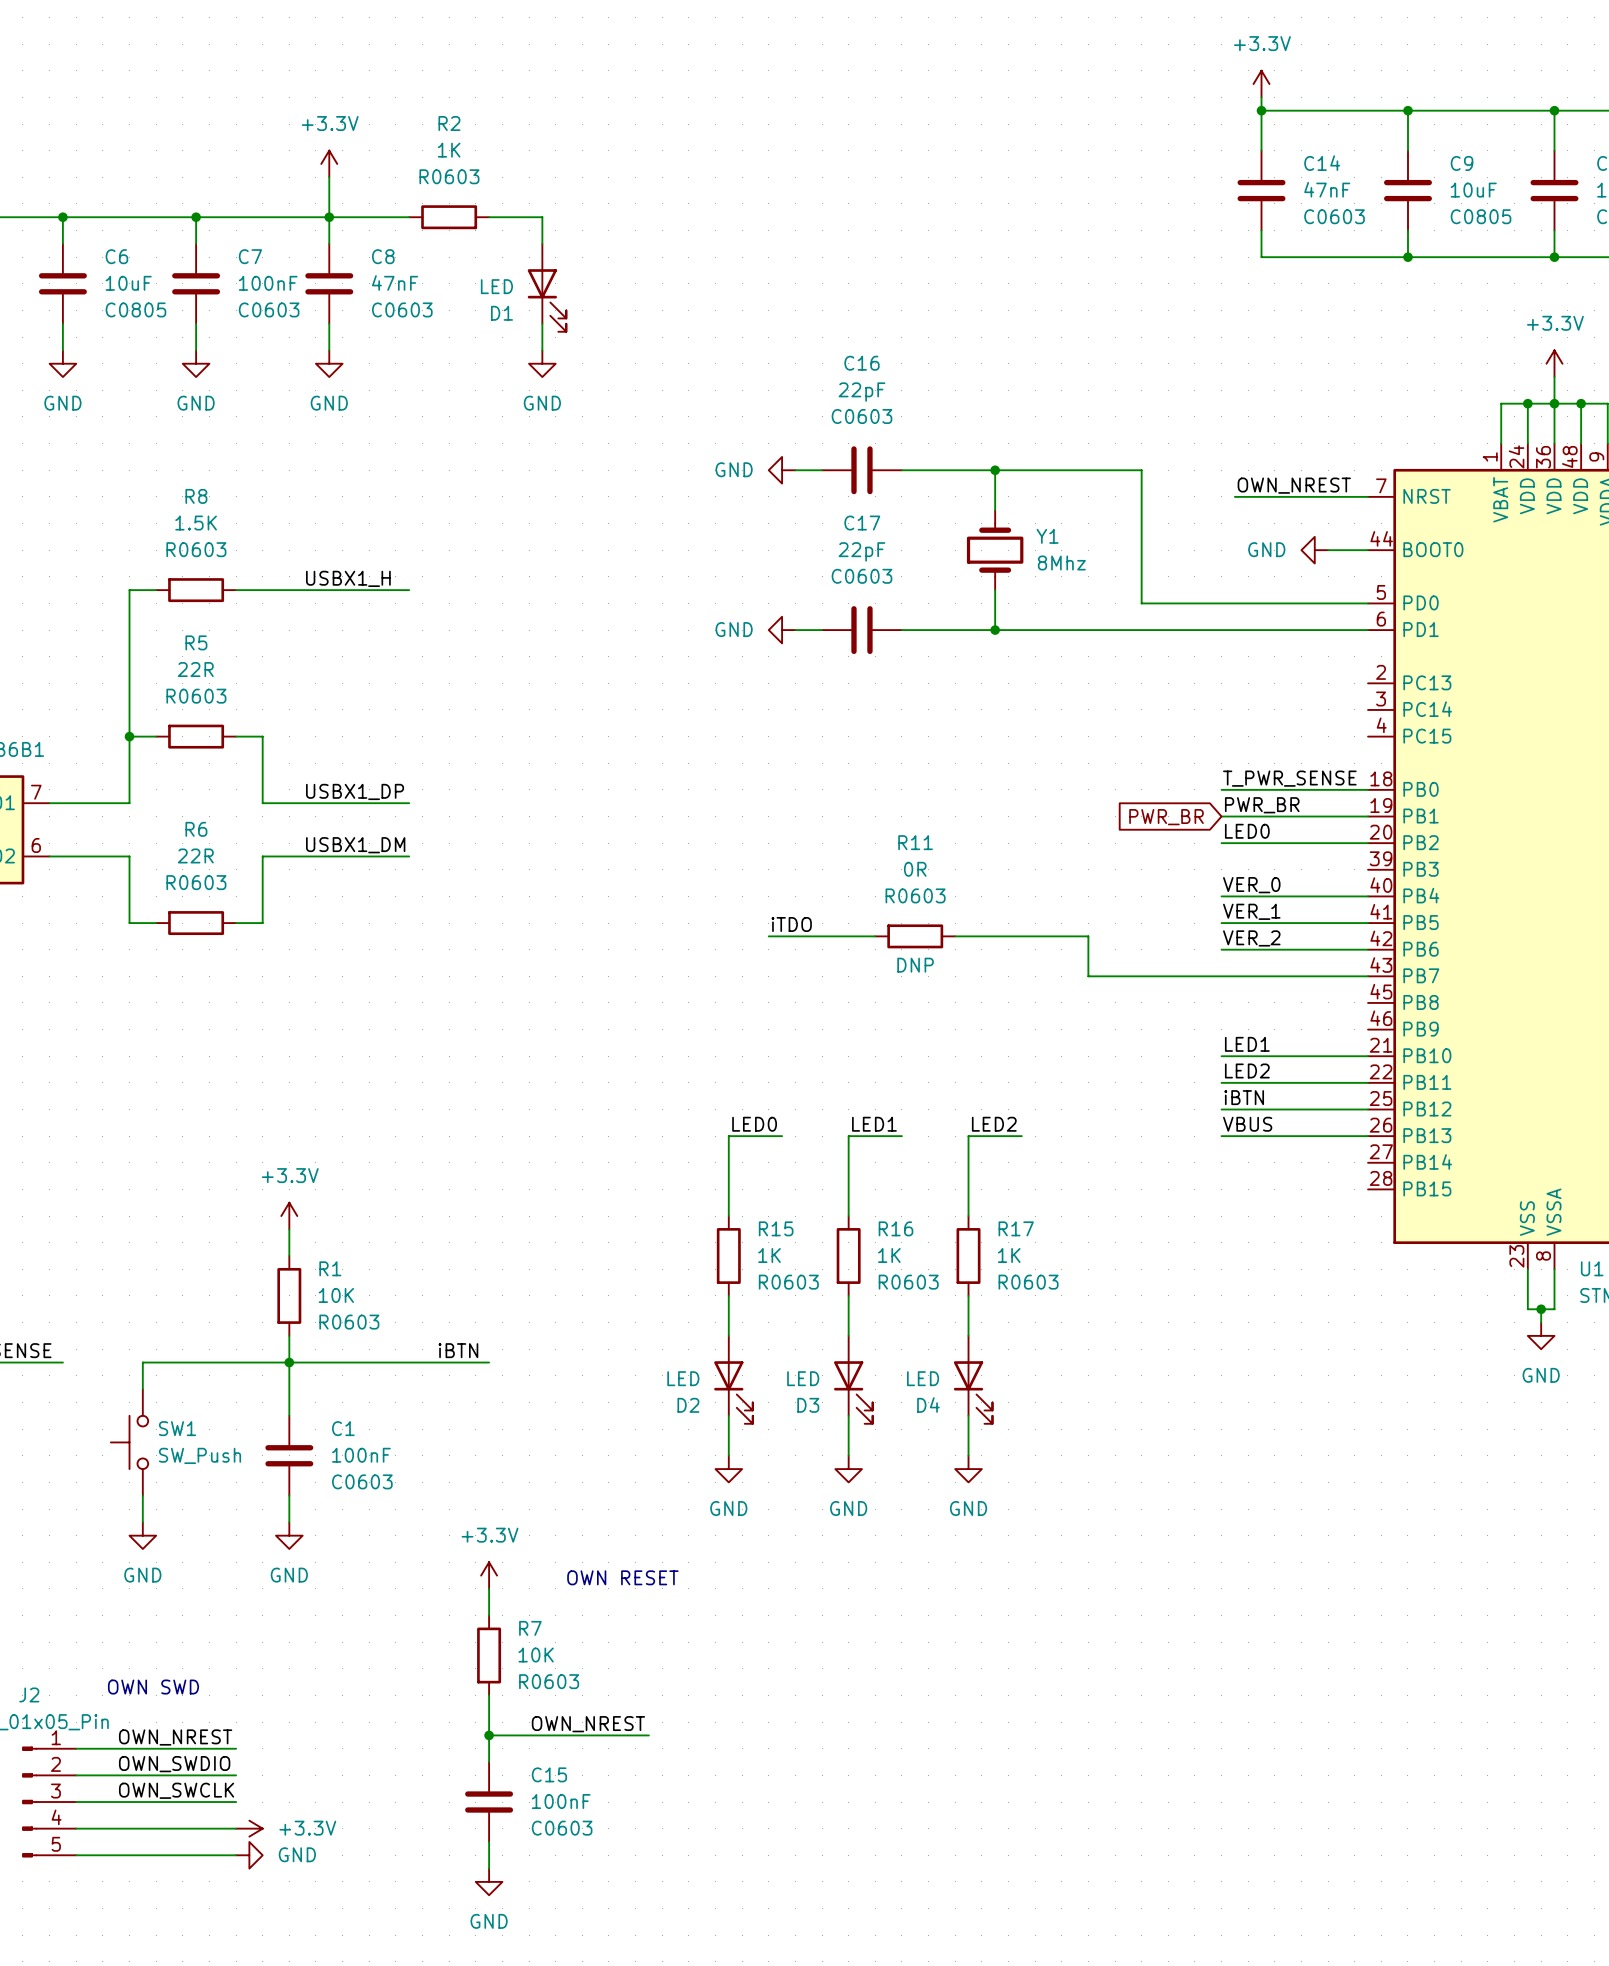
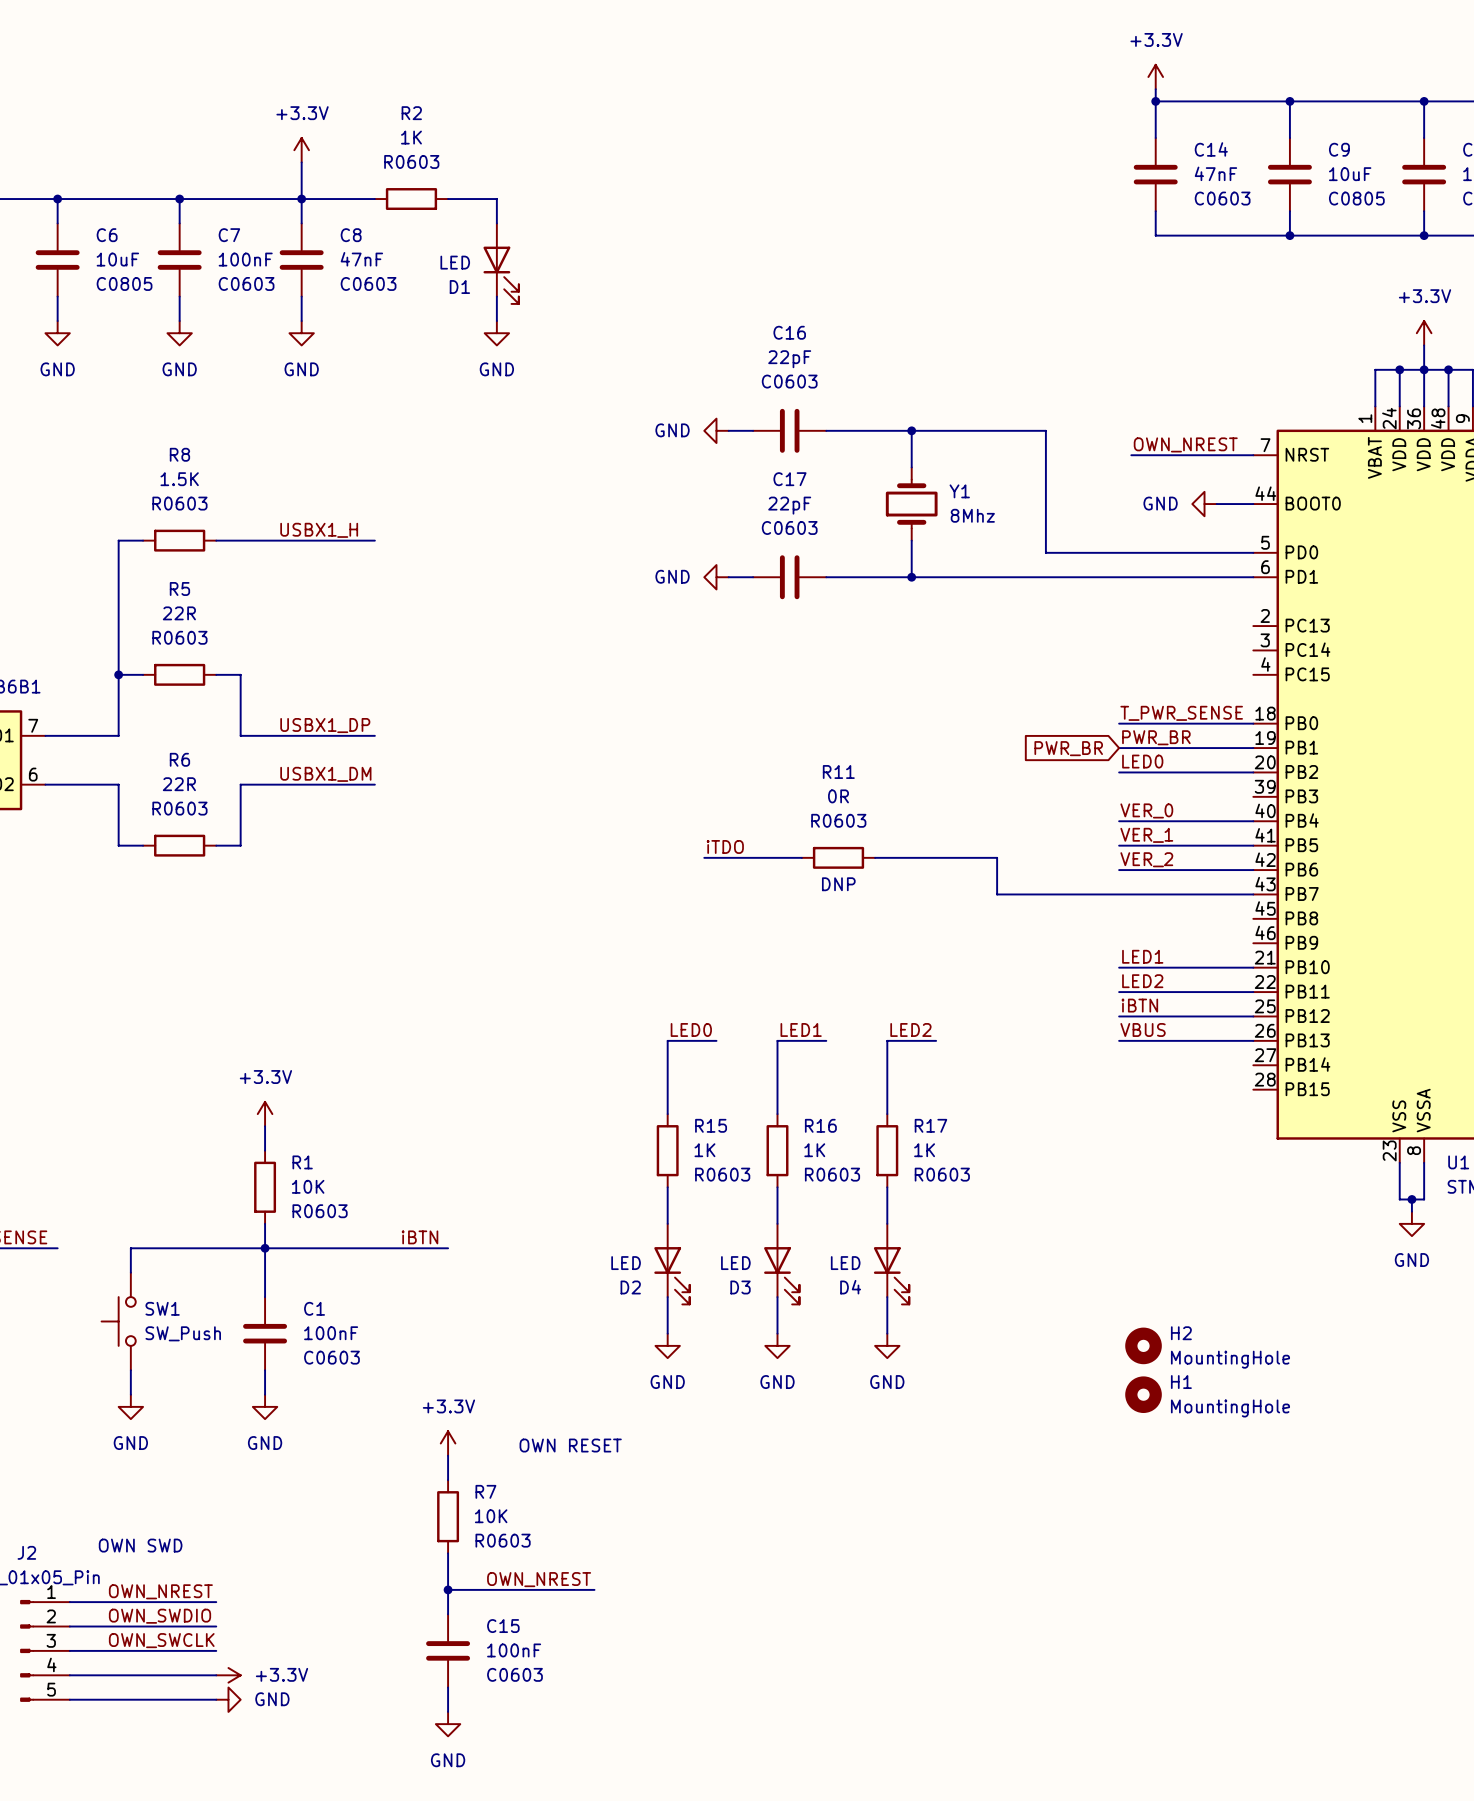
H2: none -> MountingHole (1143, 1345)
H1: none -> MountingHole (1143, 1394)

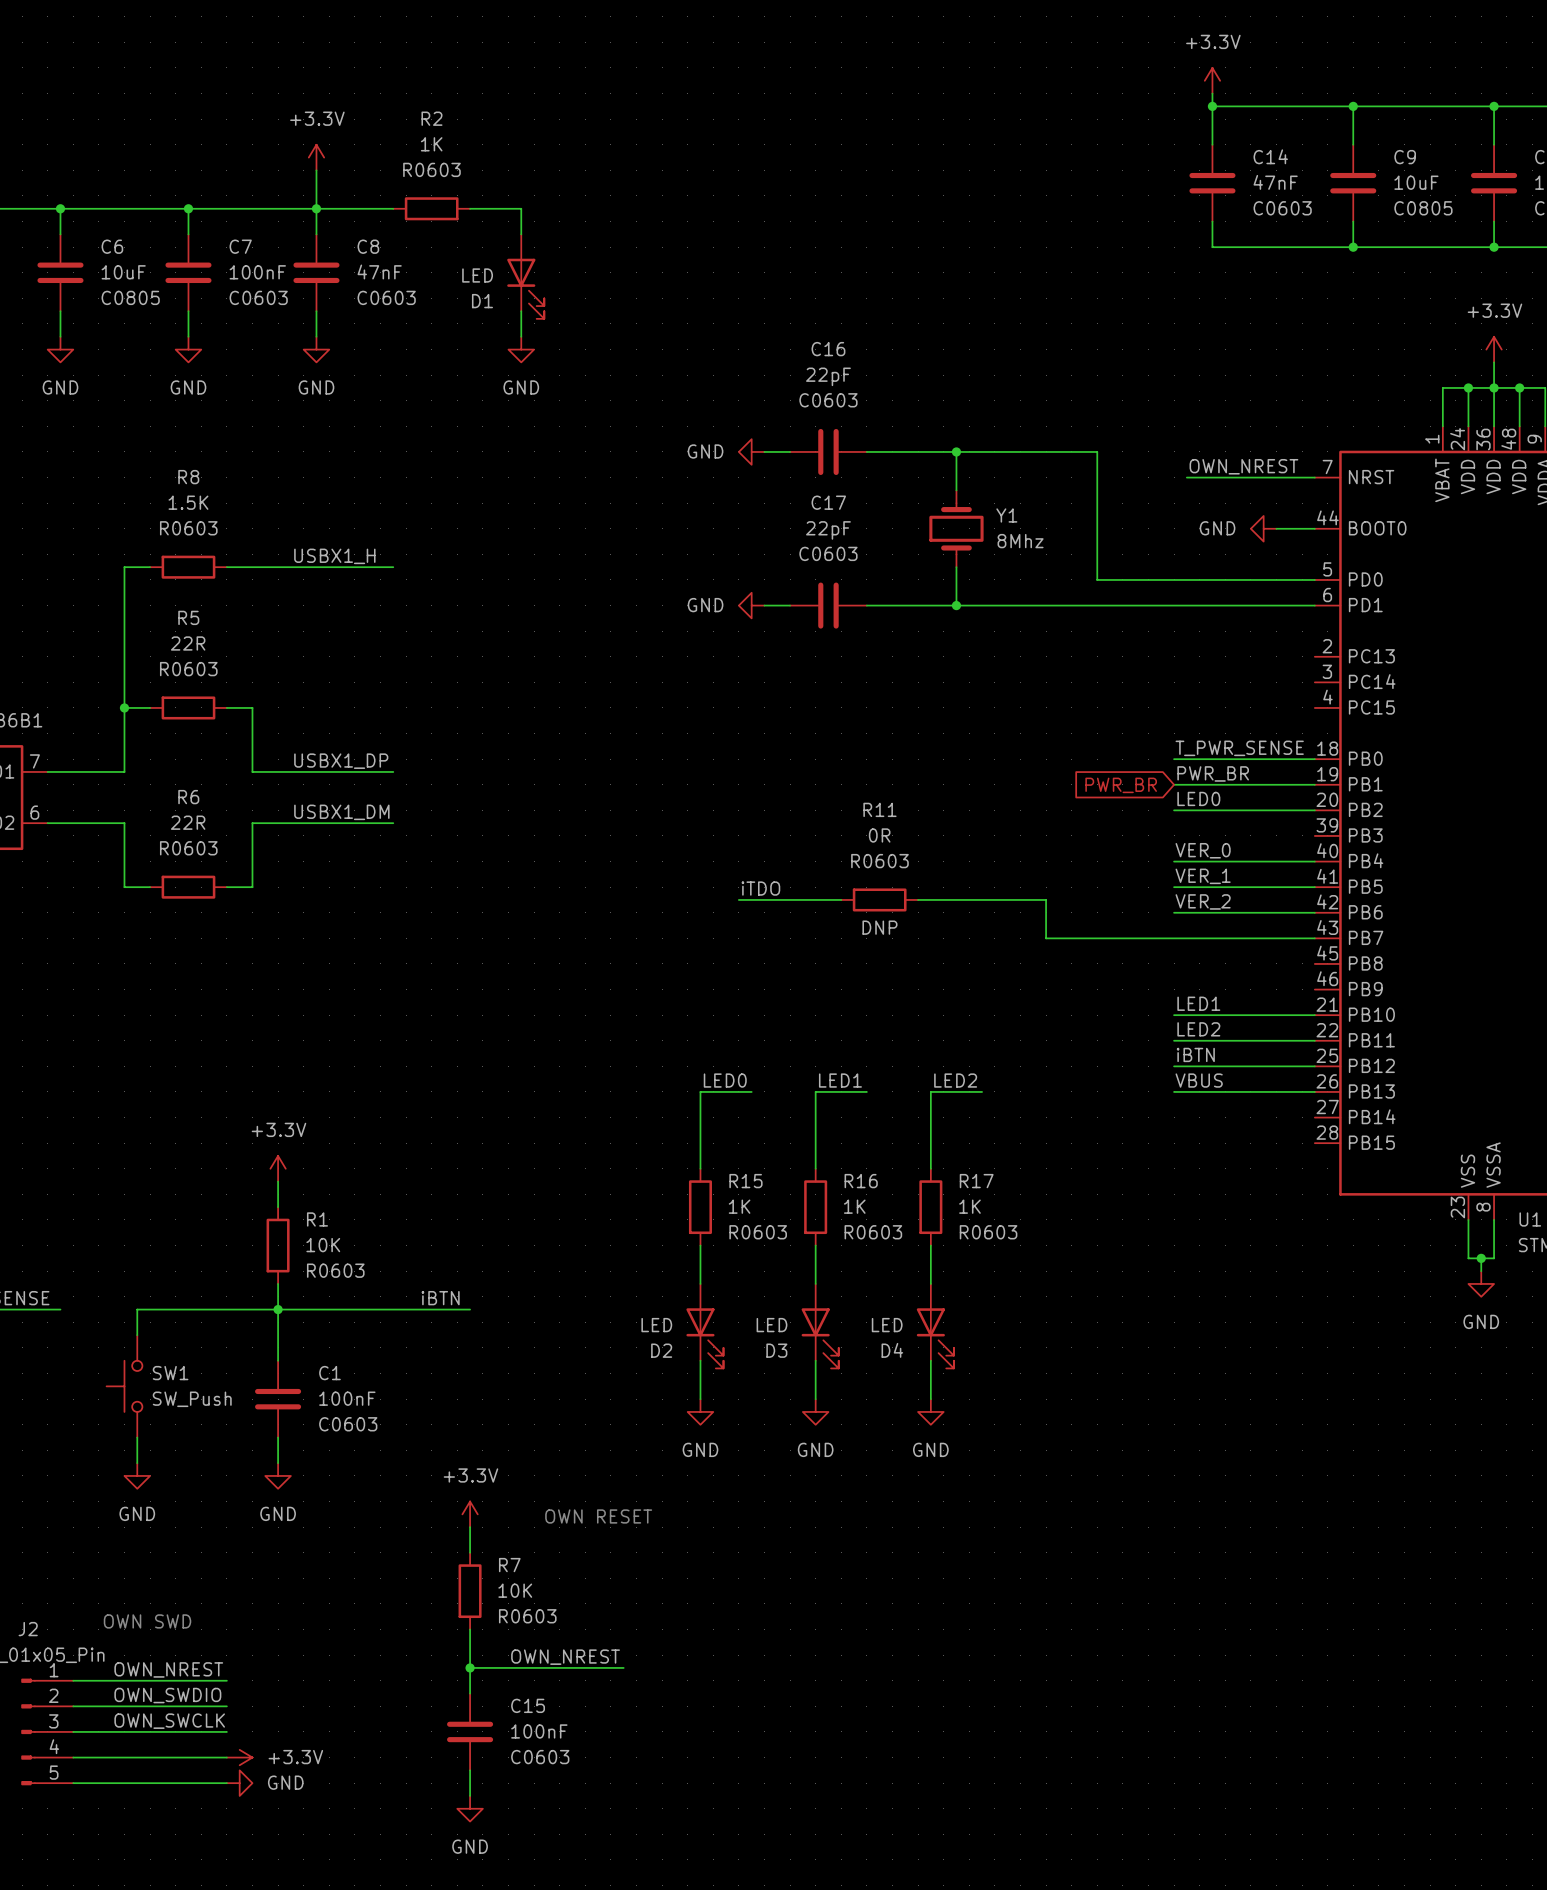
H2: MountingHole (1143, 1345) -> none
H1: MountingHole (1143, 1394) -> none

